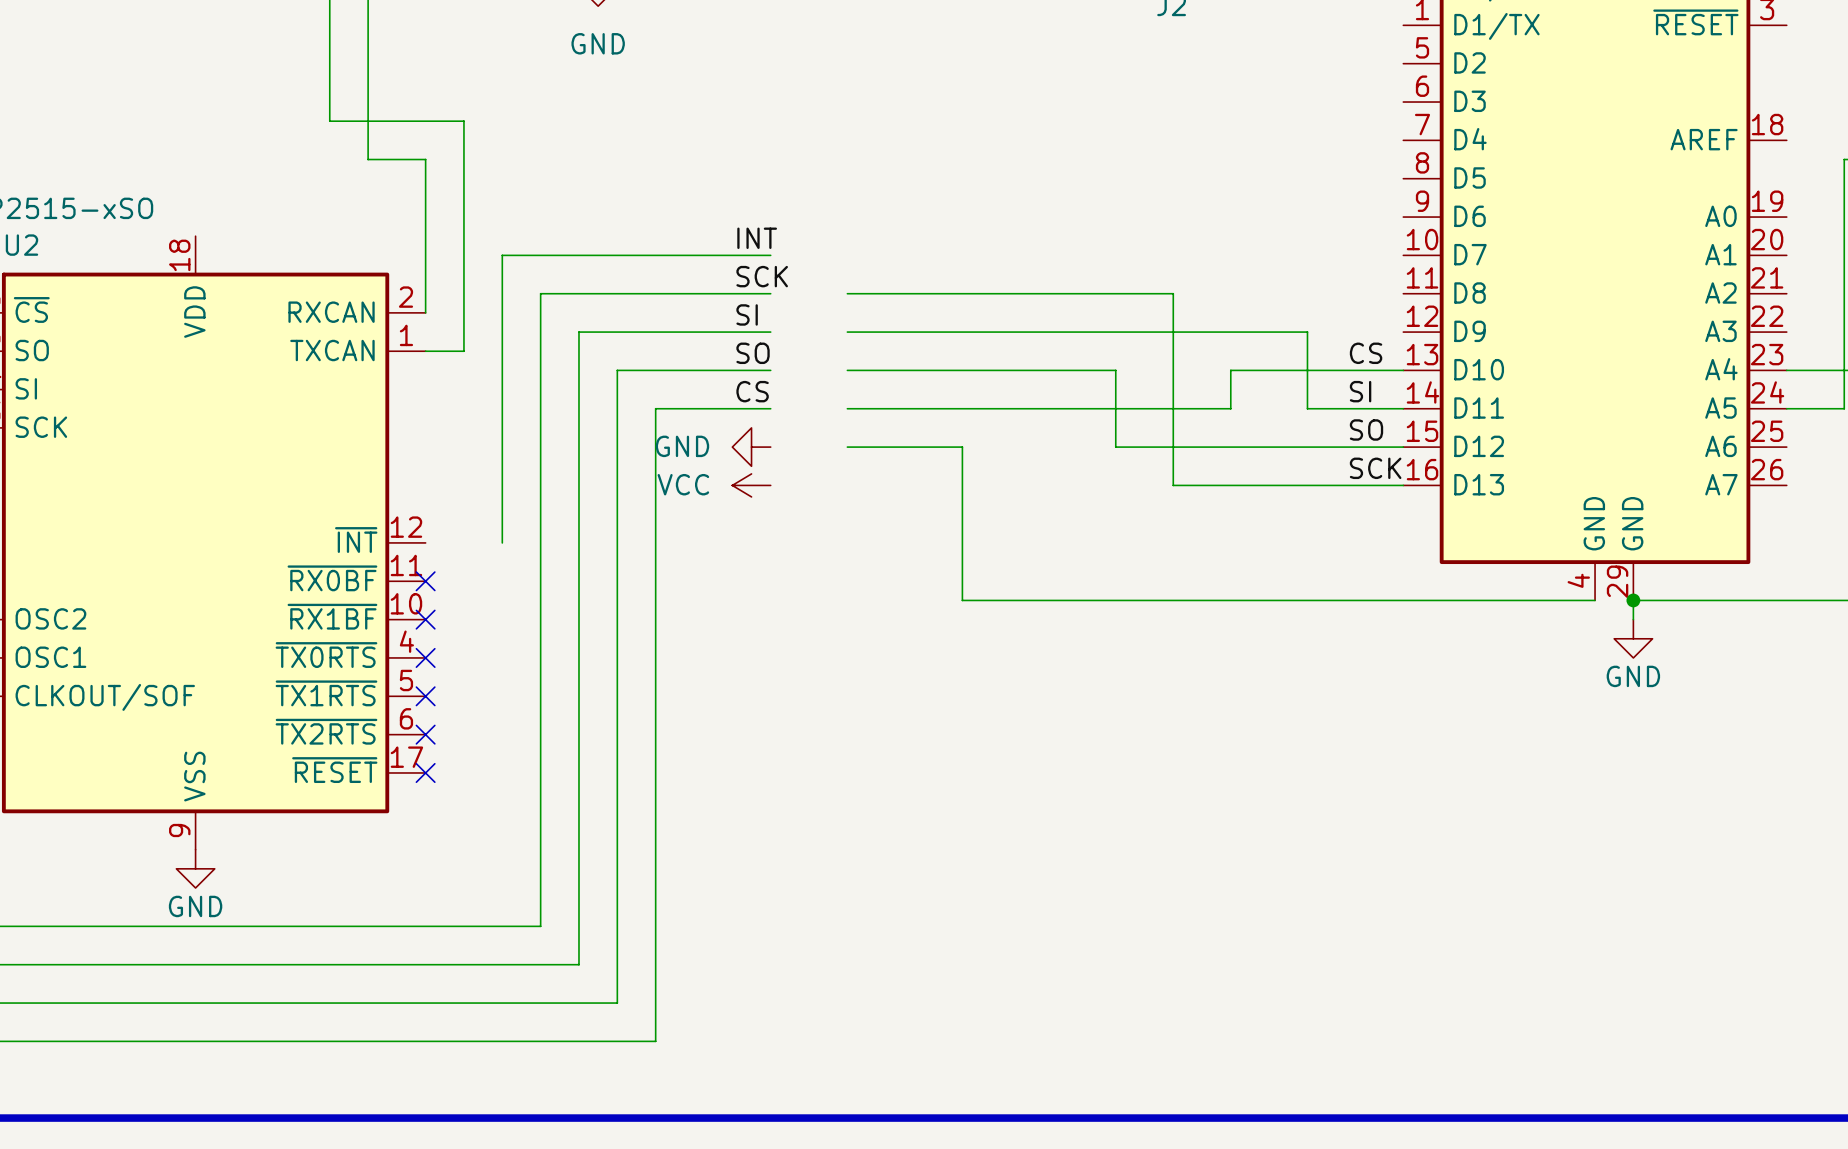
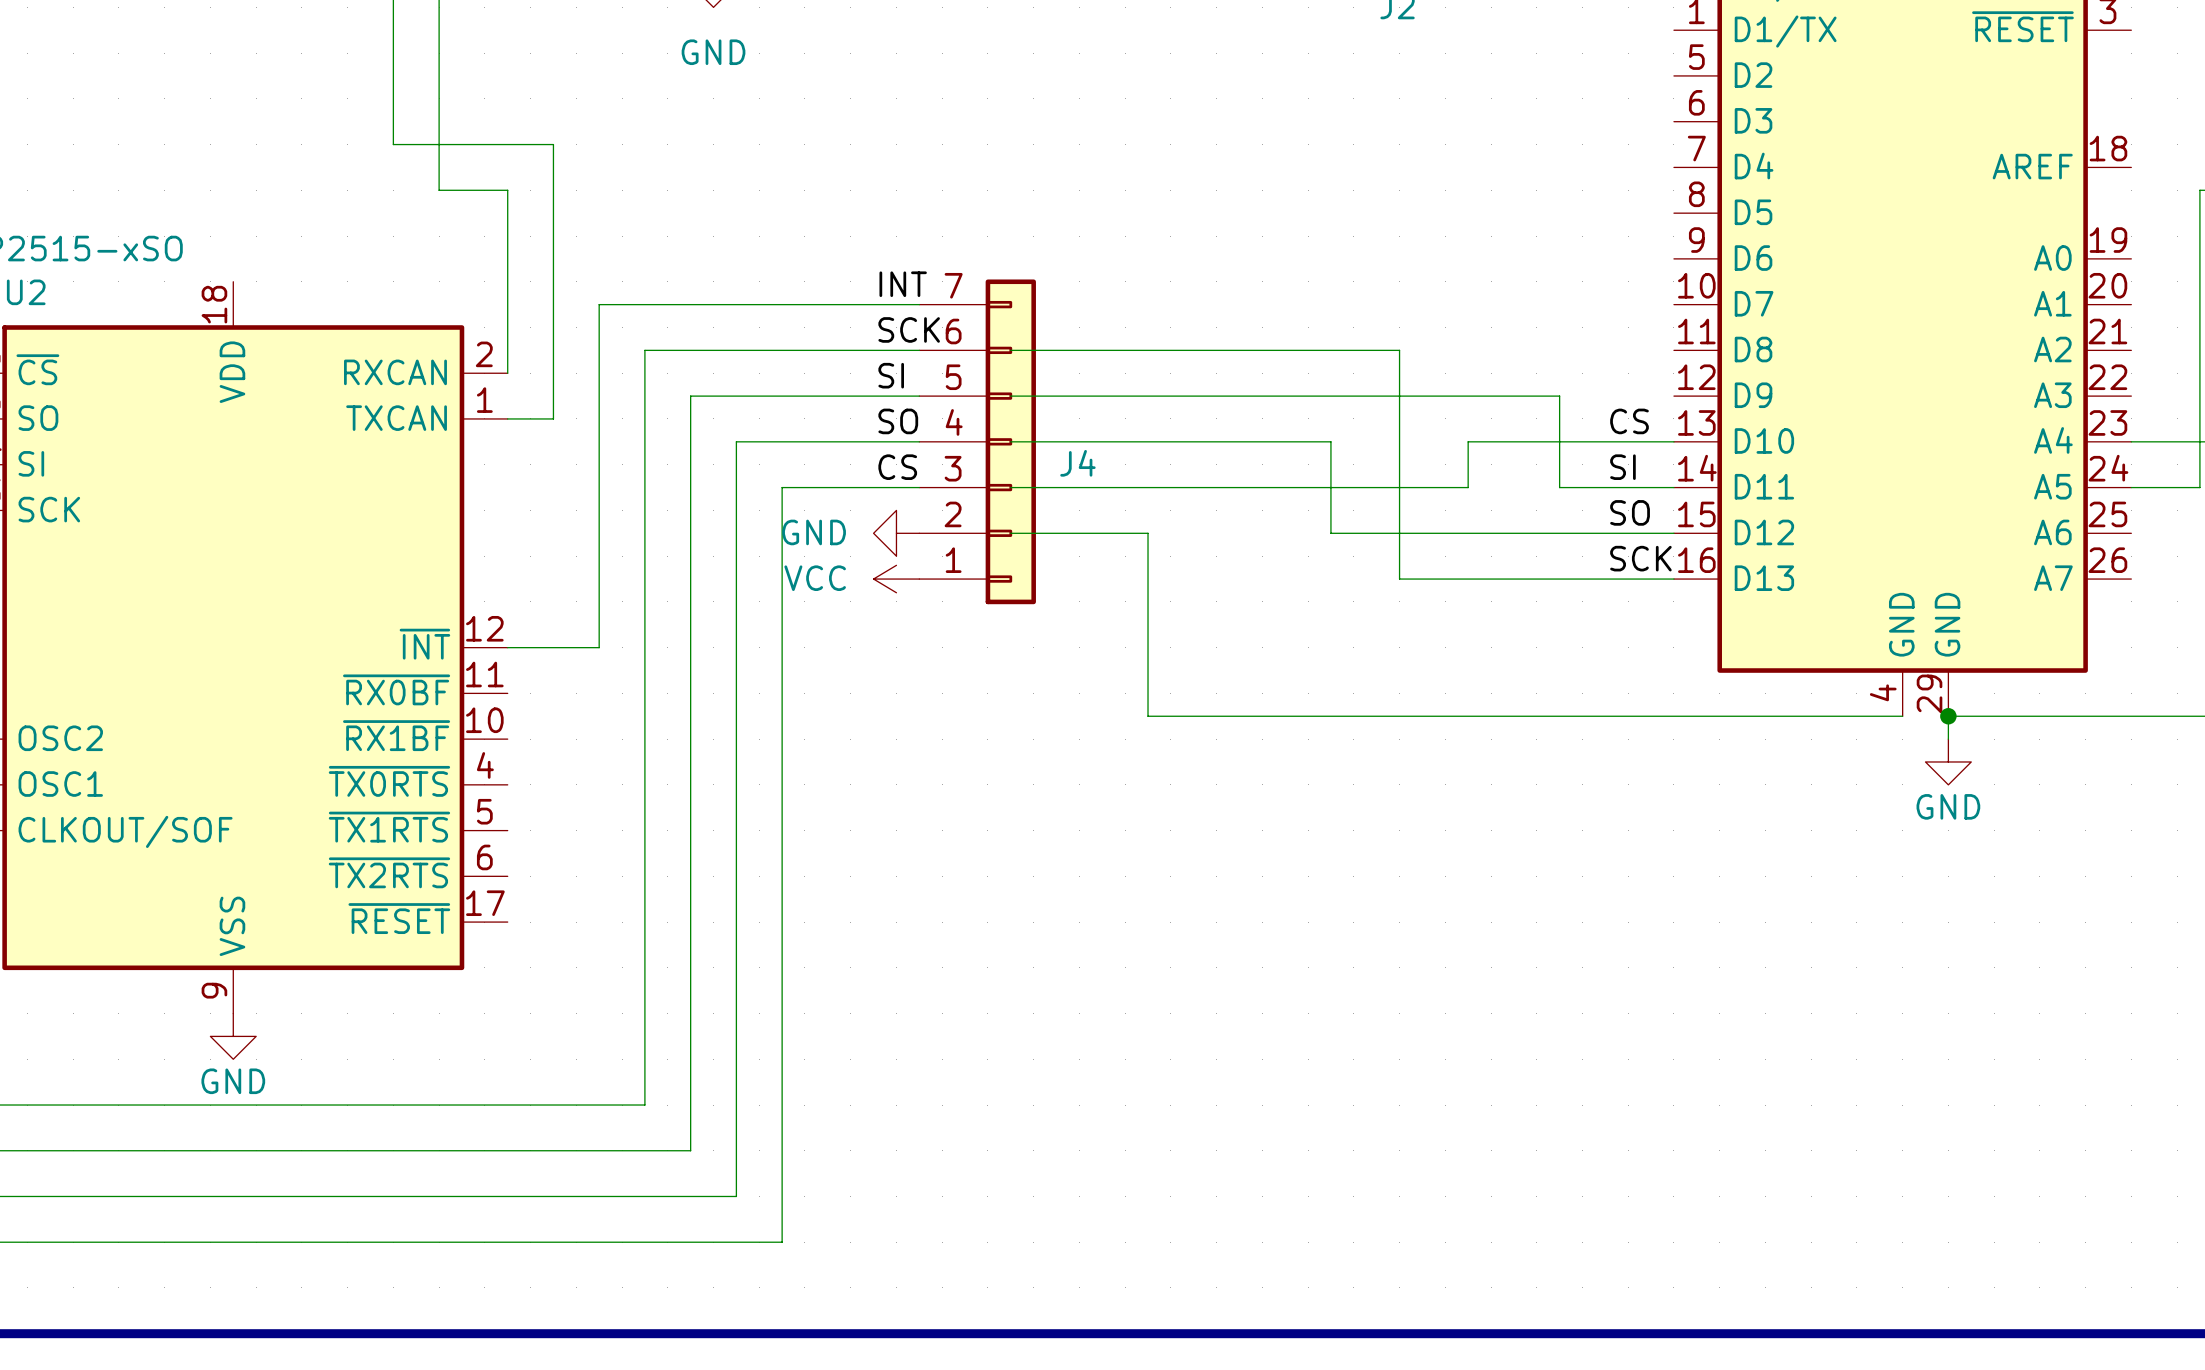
J4: none -> (977, 441)
wire: none -> (507, 647) (599, 647)
no-connect mark: (425, 581) -> none
no-connect mark: (425, 619) -> none
no-connect mark: (425, 657) -> none
no-connect mark: (425, 696) -> none
no-connect mark: (425, 734) -> none
no-connect mark: (425, 772) -> none

